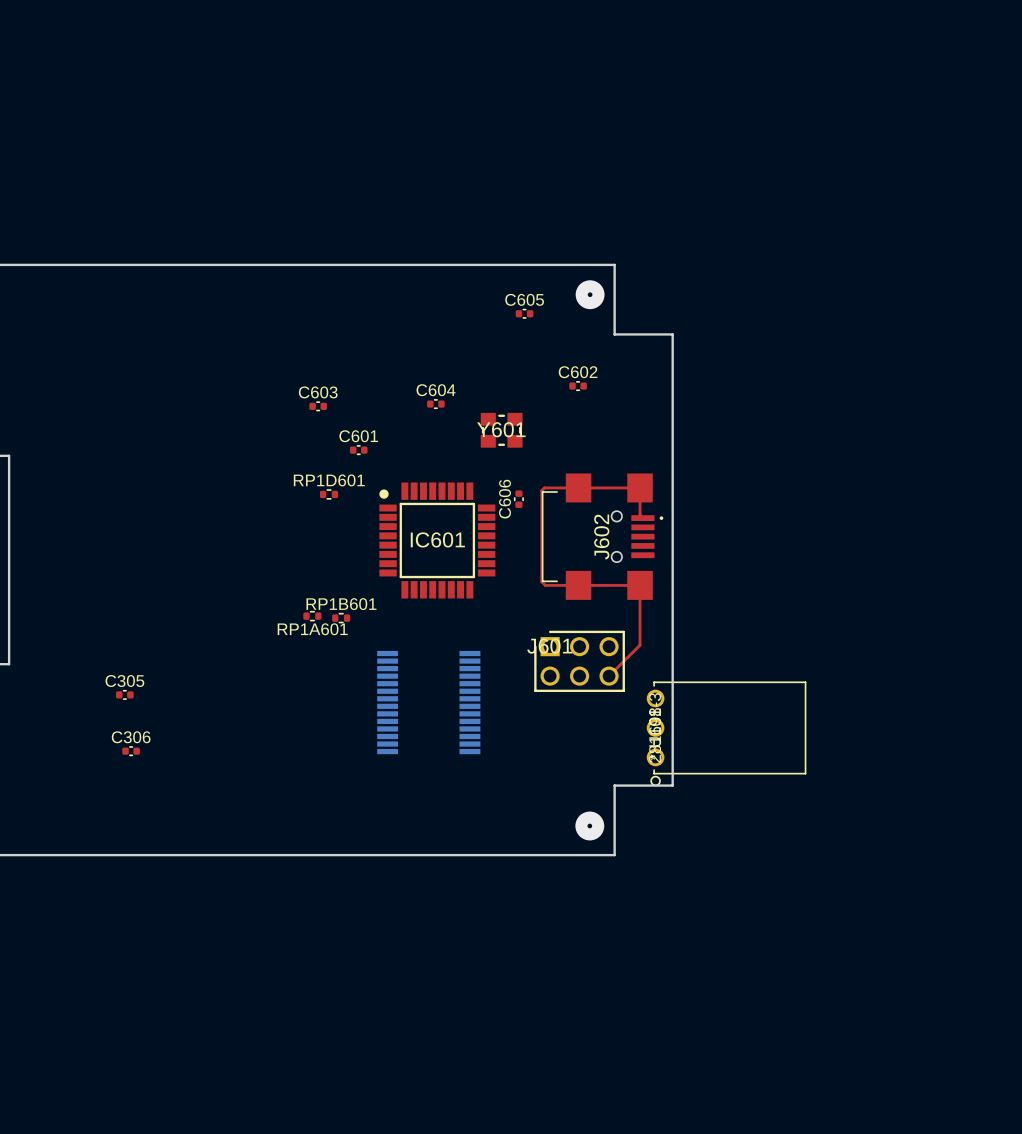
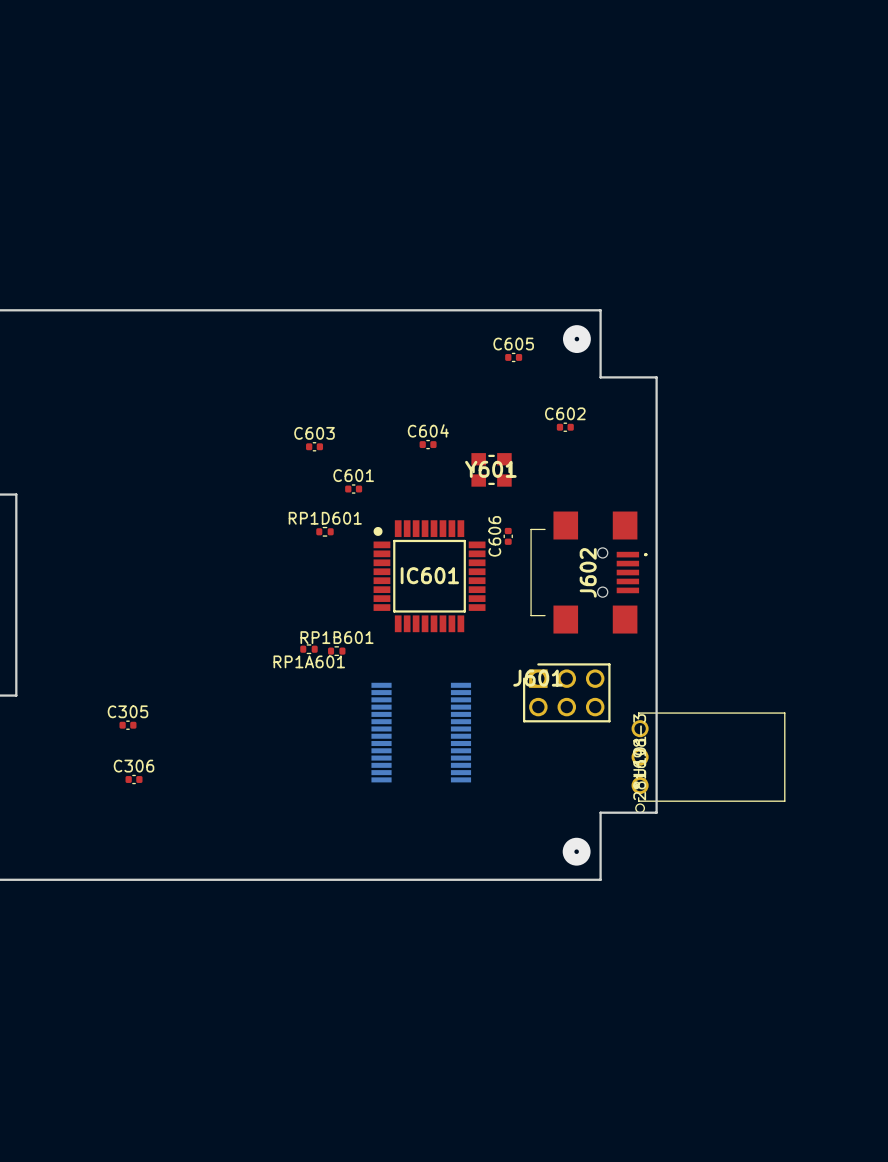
top track: (642, 518) (640, 515) (640, 487) (544, 487) (541, 490) (541, 581) (545, 585) (640, 585) (640, 645) (609, 676) -> none

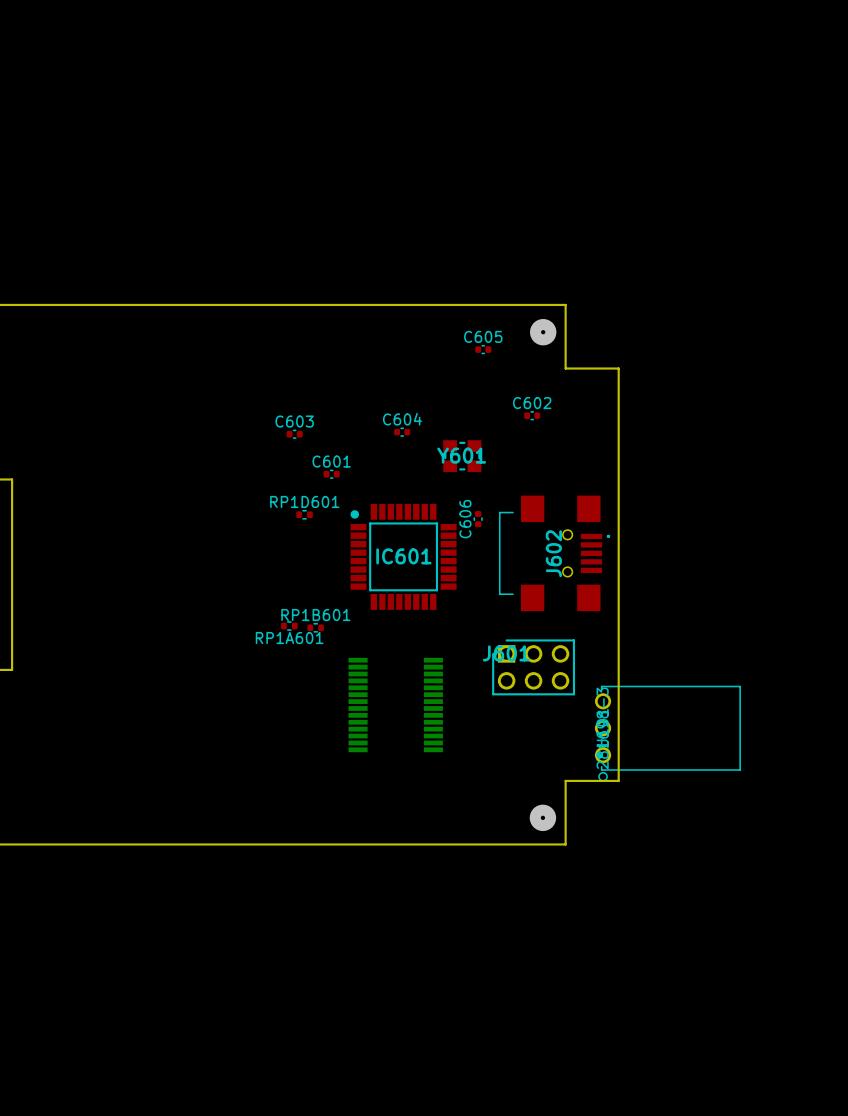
C305: (127, 725) -> none
C306: (134, 779) -> none

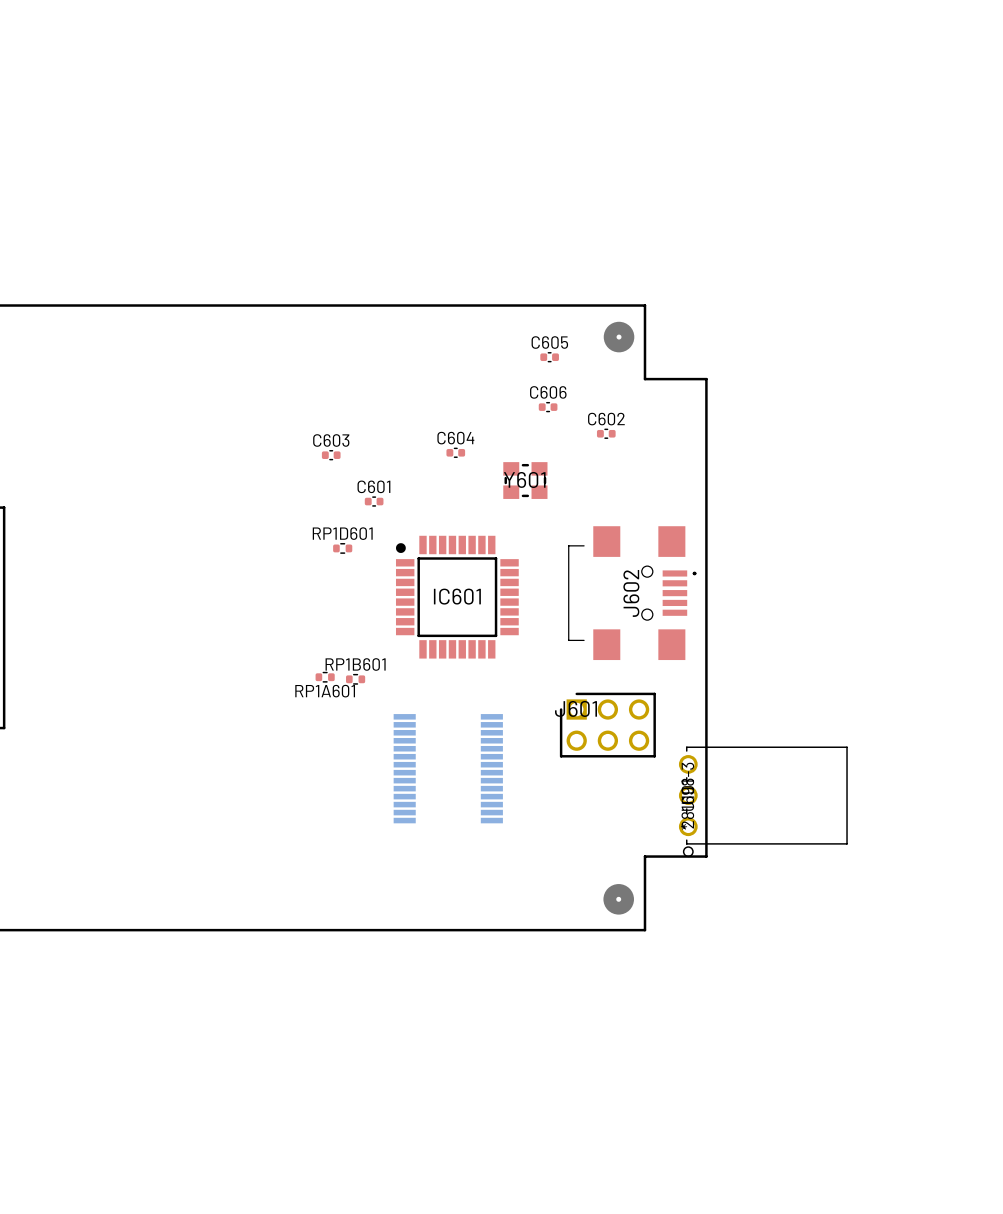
C606 rotation: 0° (478, 519) -> 90° clockwise (548, 407)
C606 position: (478, 519) -> (548, 407)

